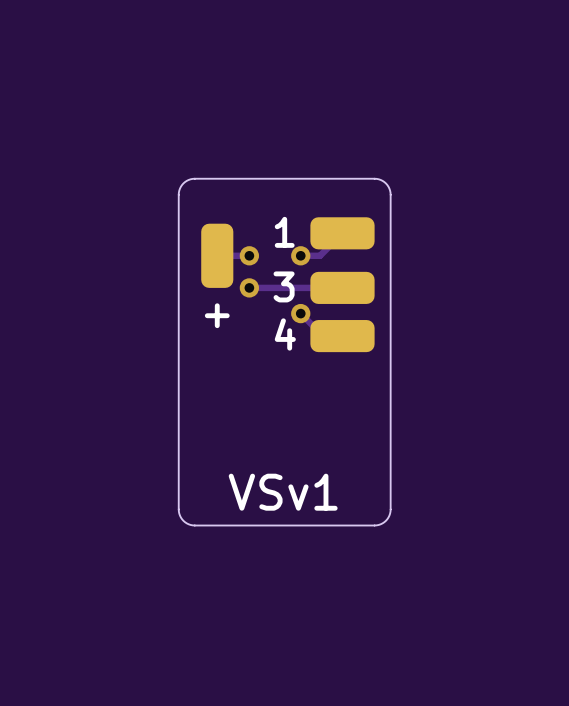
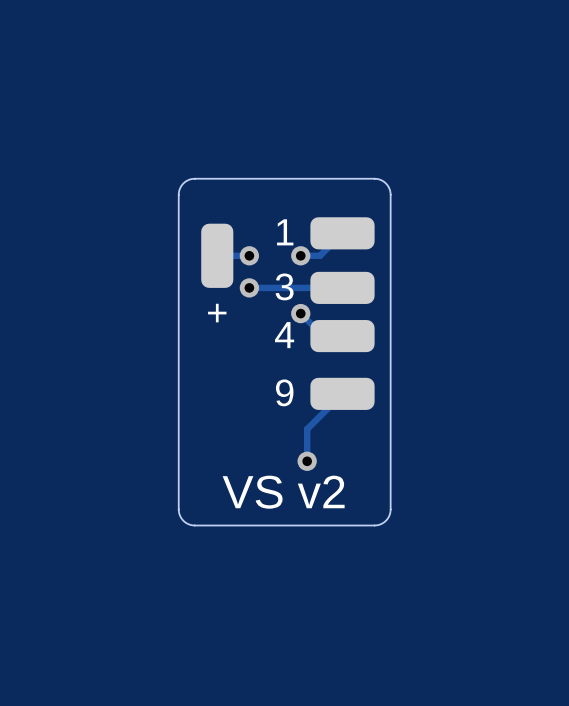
text: none -> 9 (284, 392)
track: none -> (342, 393) (307, 429) (307, 461)
part: none -> (342, 393)
via: none -> (307, 461)
text: VSv1 (283, 492) -> VS v2 (283, 492)

